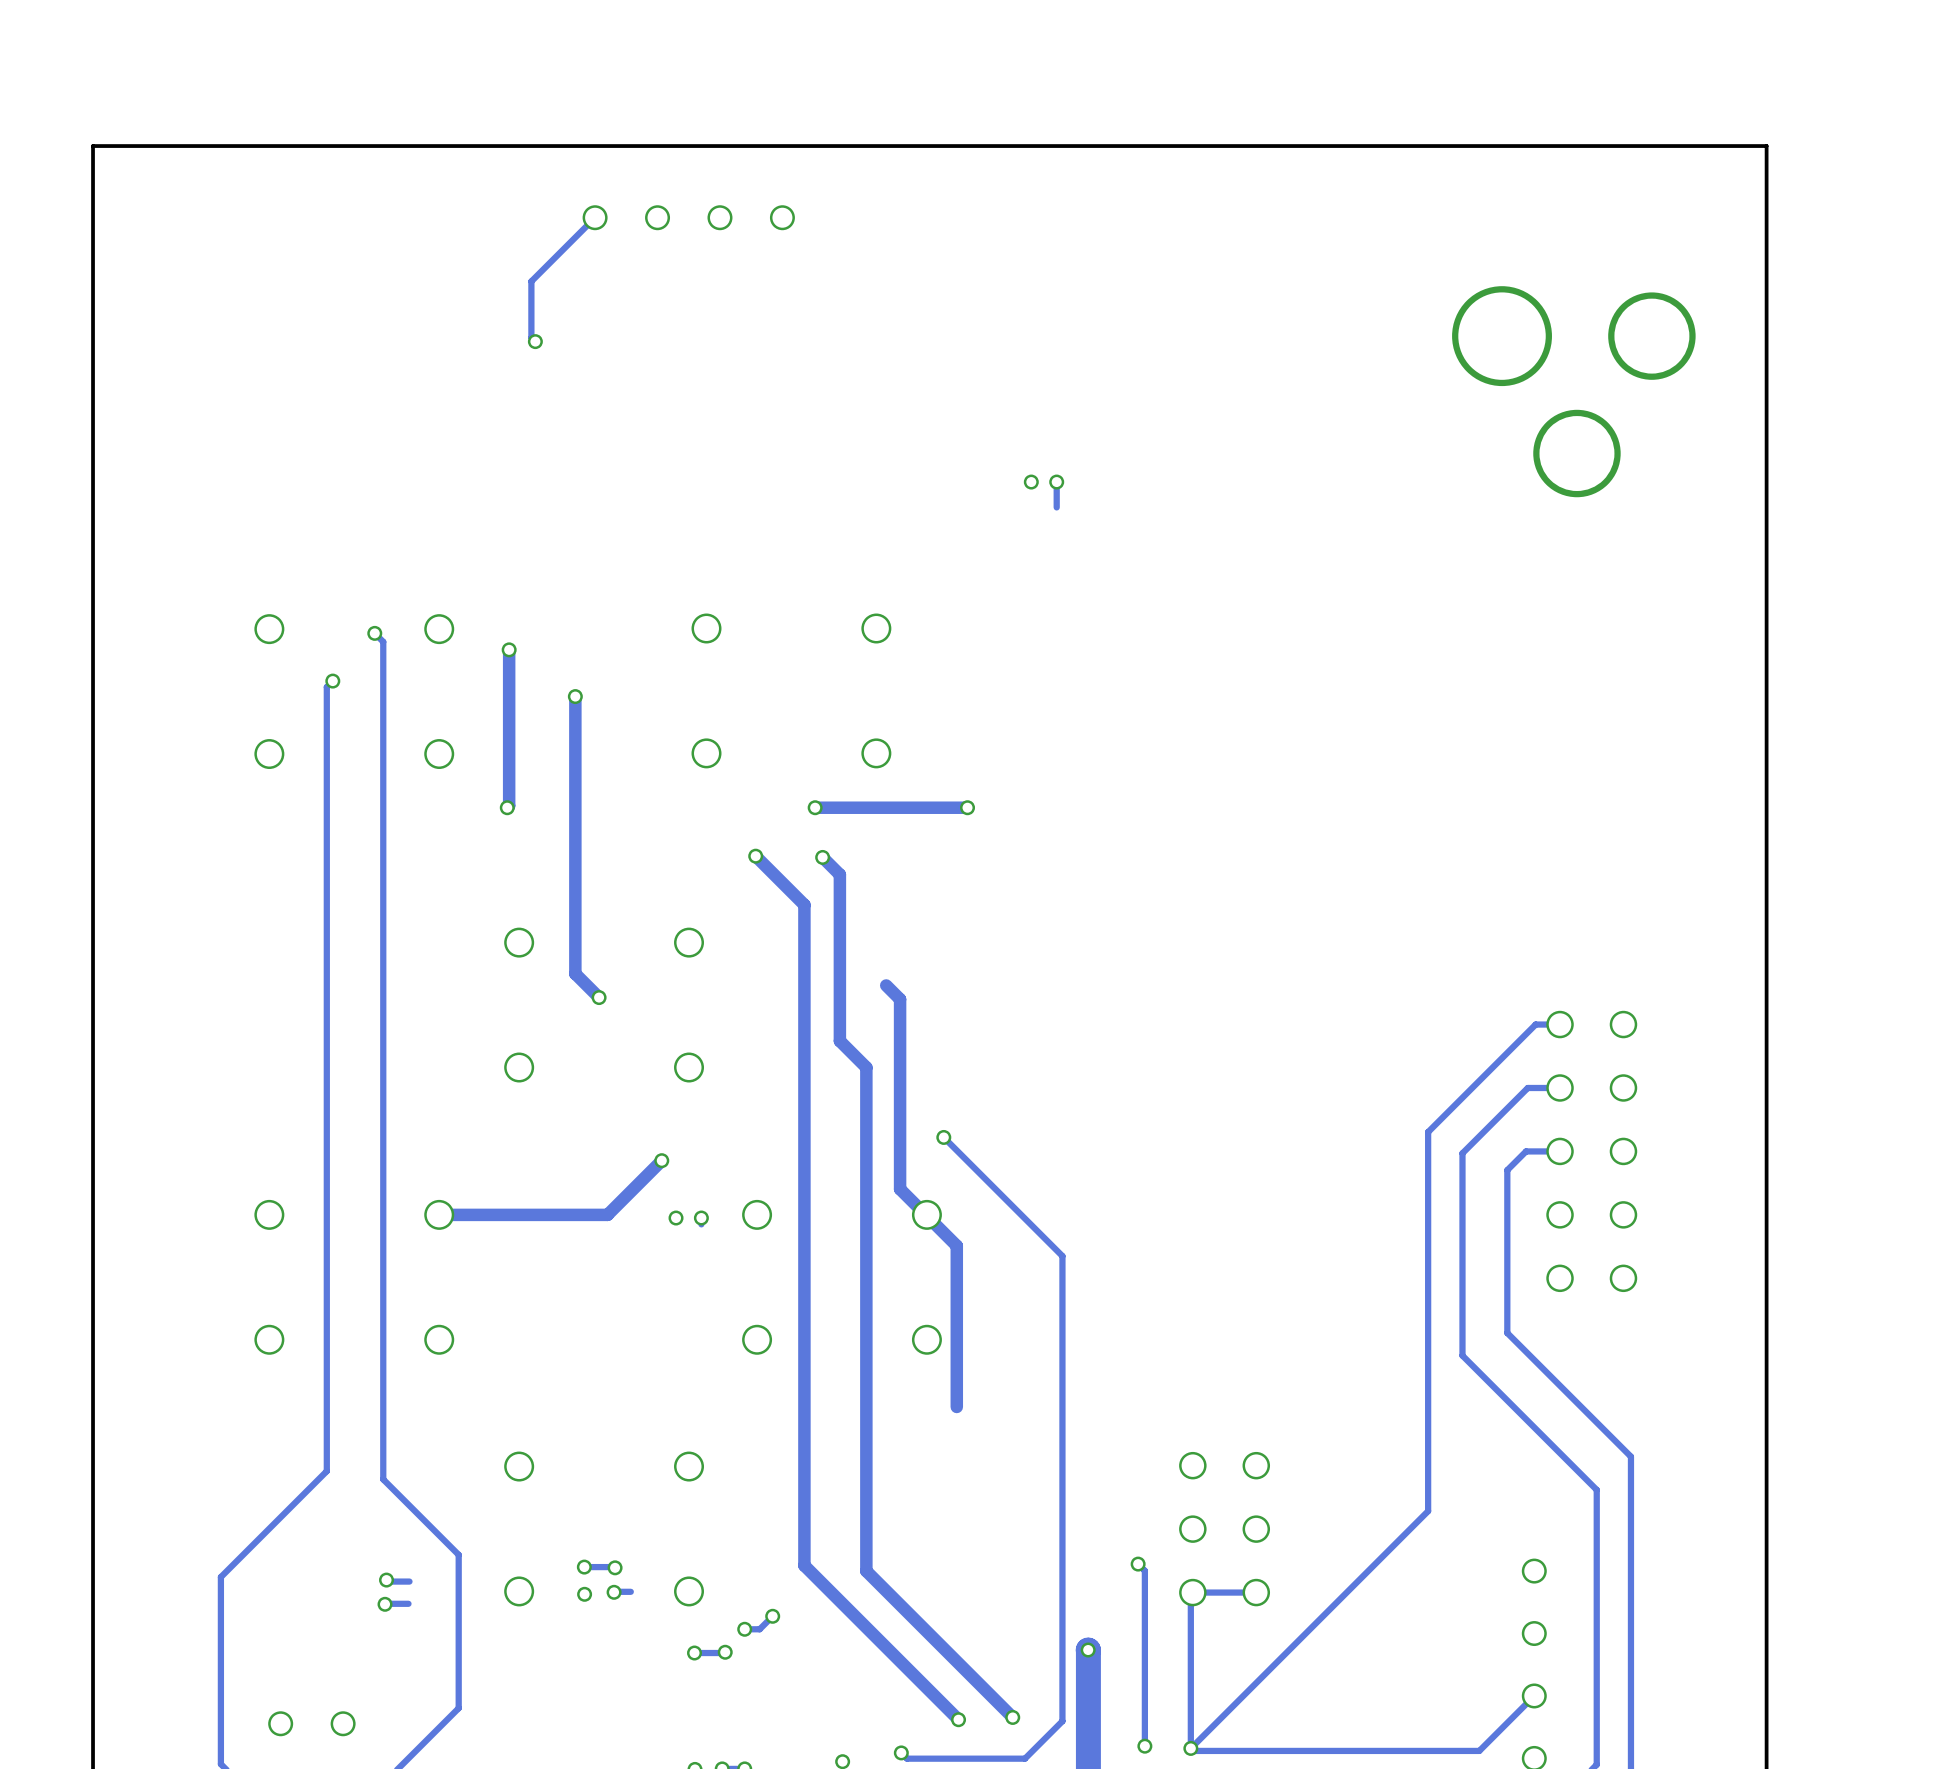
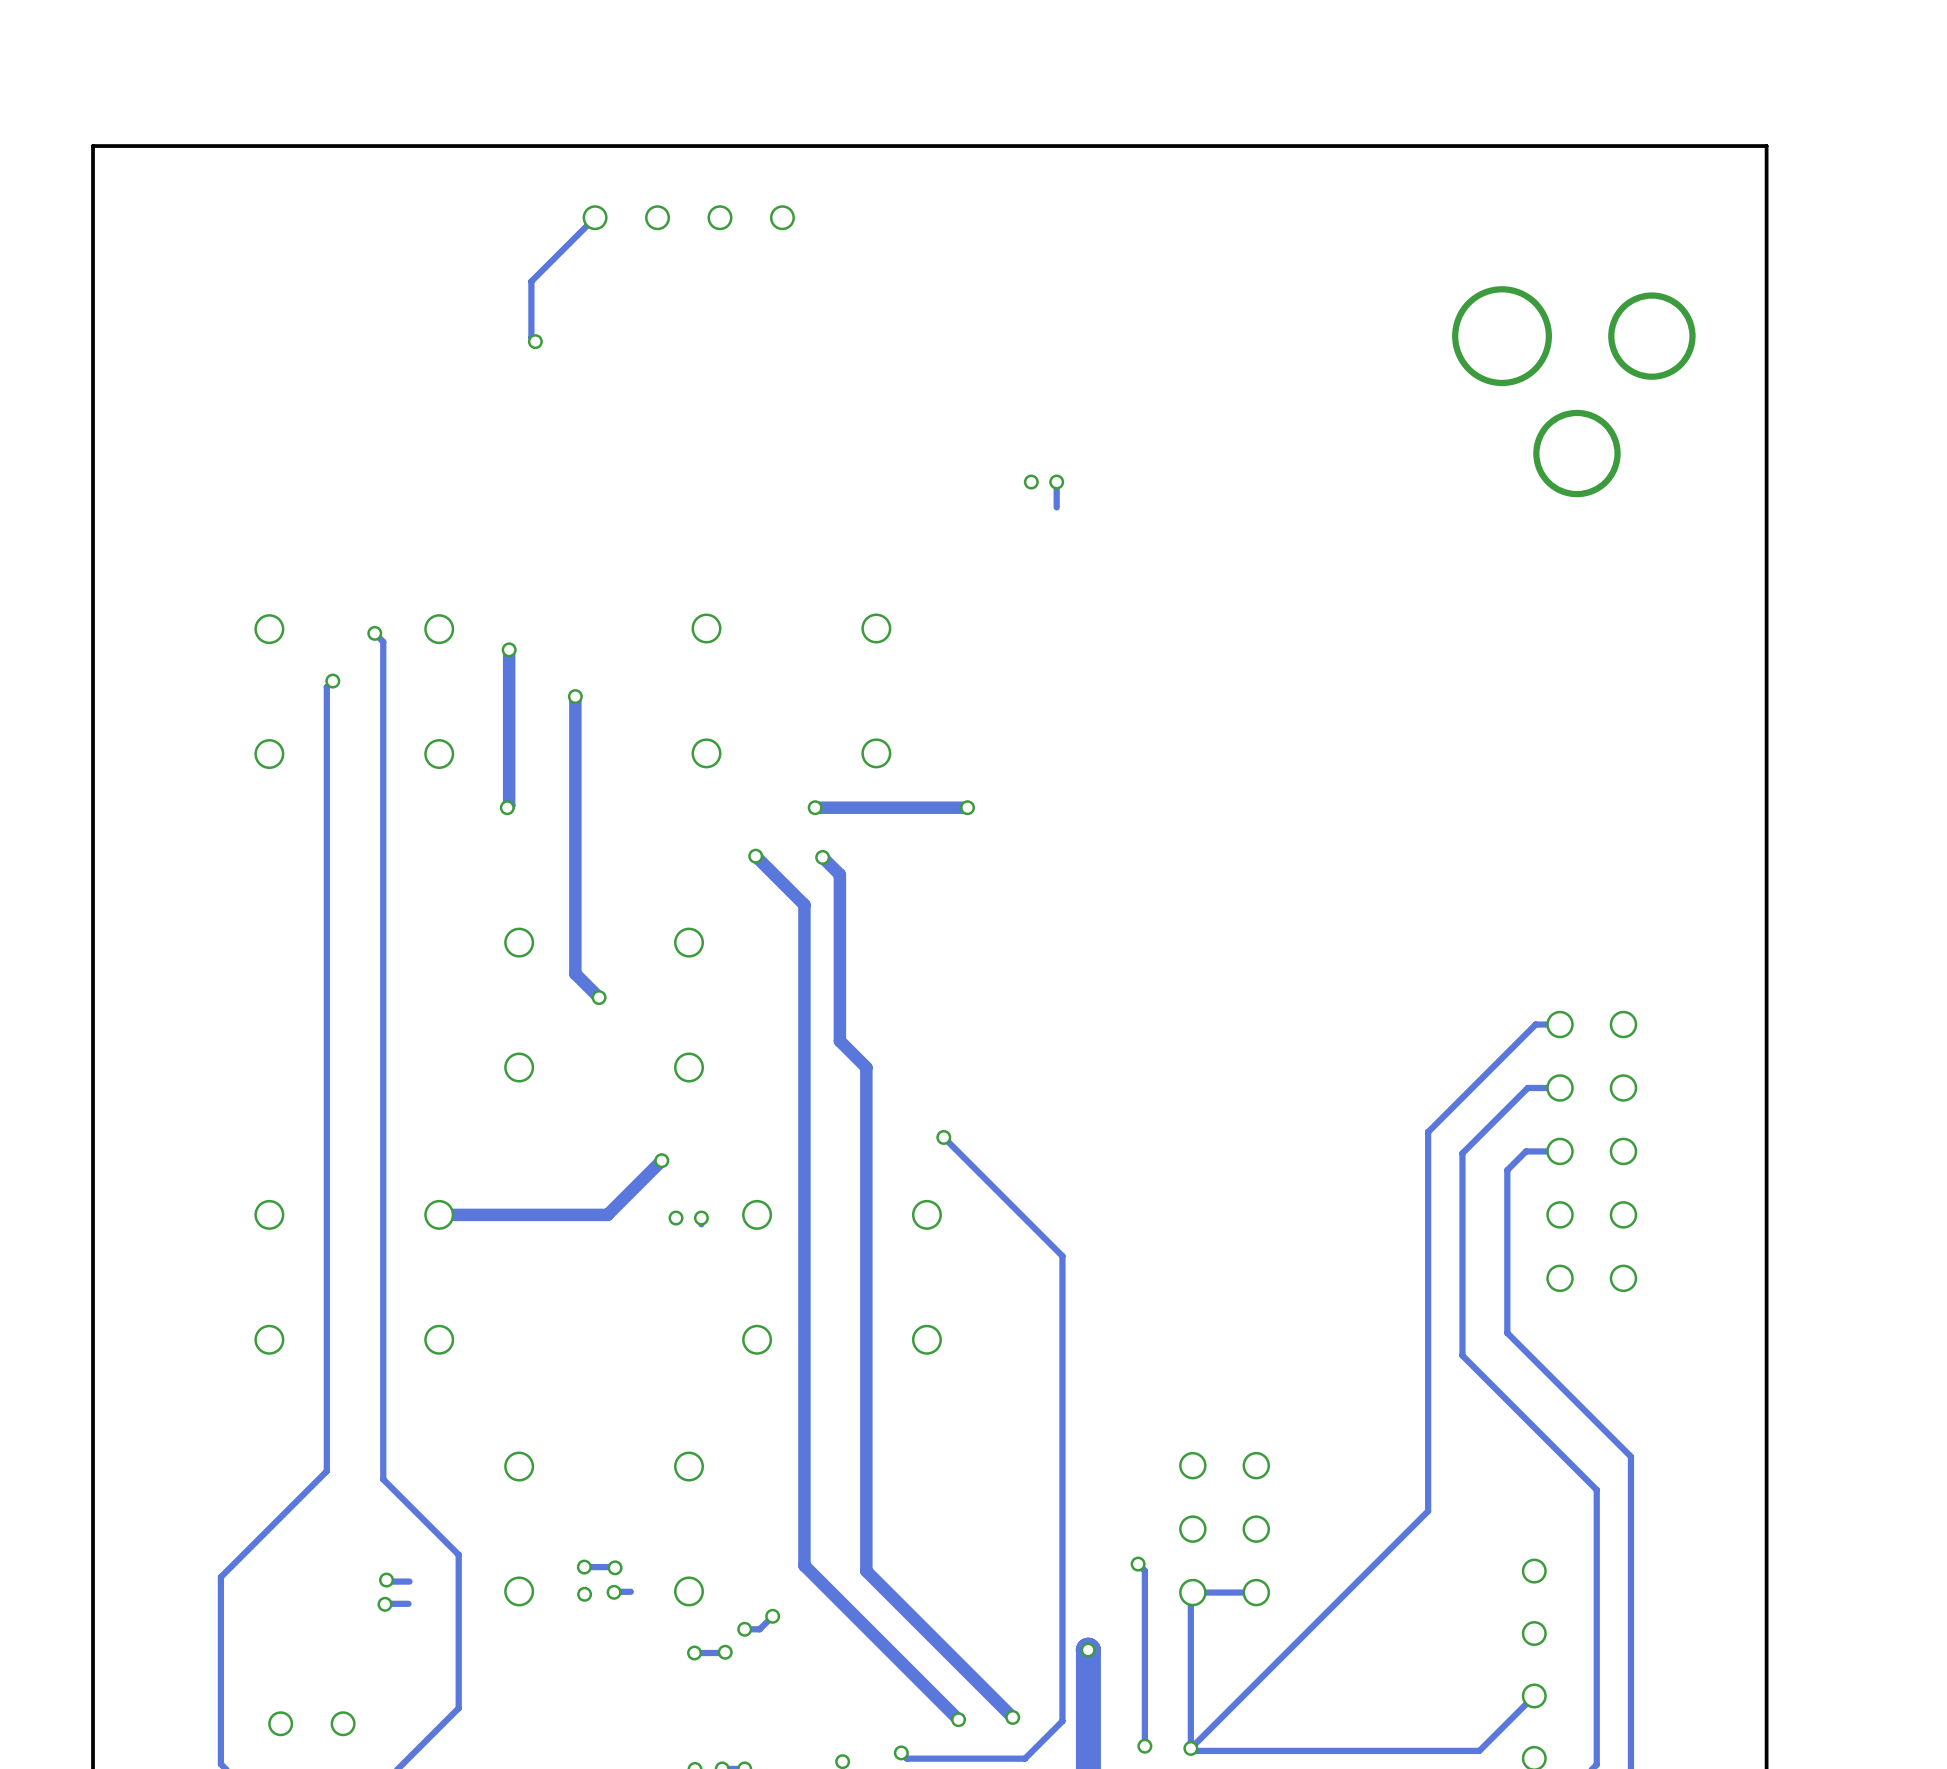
track: (886, 985) (900, 999) (900, 1189) (956, 1245) (956, 1406) -> none

